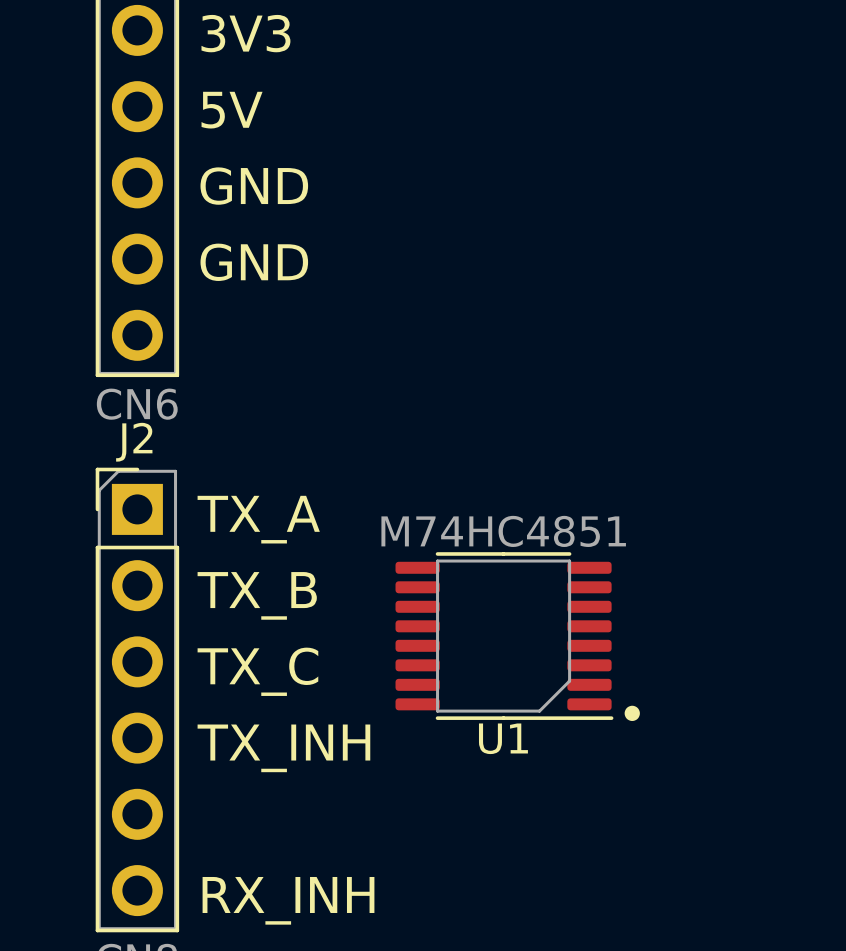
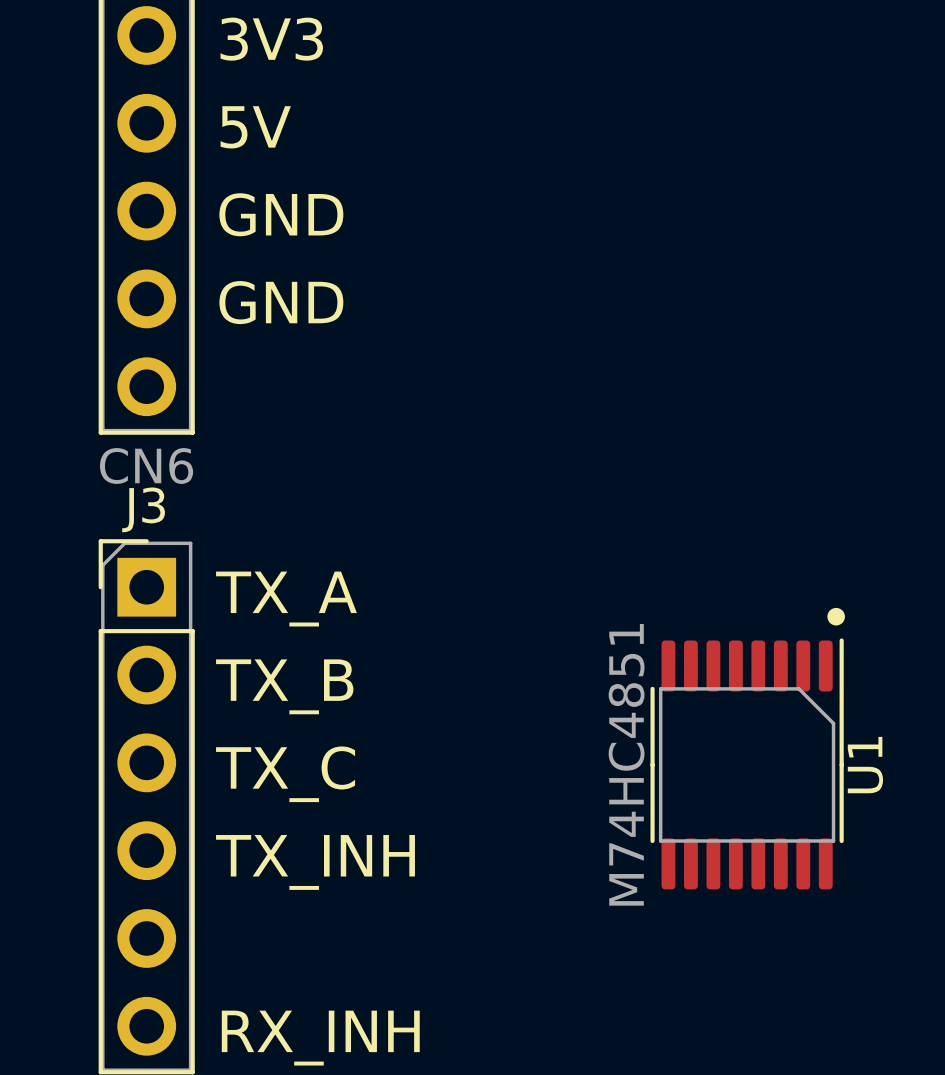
J2 name: J2 (134, 442) -> J3 (143, 509)
U1 rotation: 0° (504, 636) -> 90° counterclockwise (747, 763)
U1 position: (504, 636) -> (747, 763)
drawing position: (632, 713) -> (836, 616)

